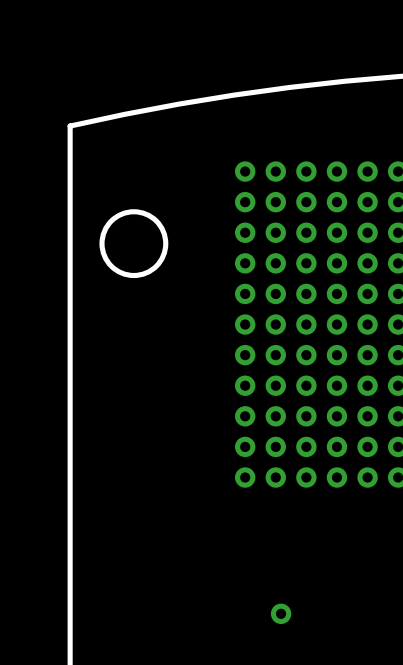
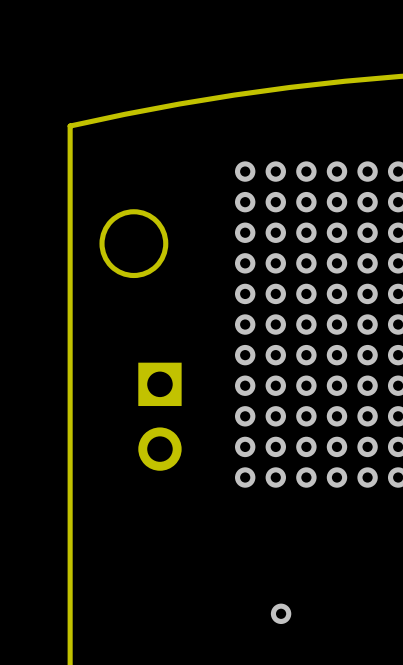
part: none -> (159, 416)

